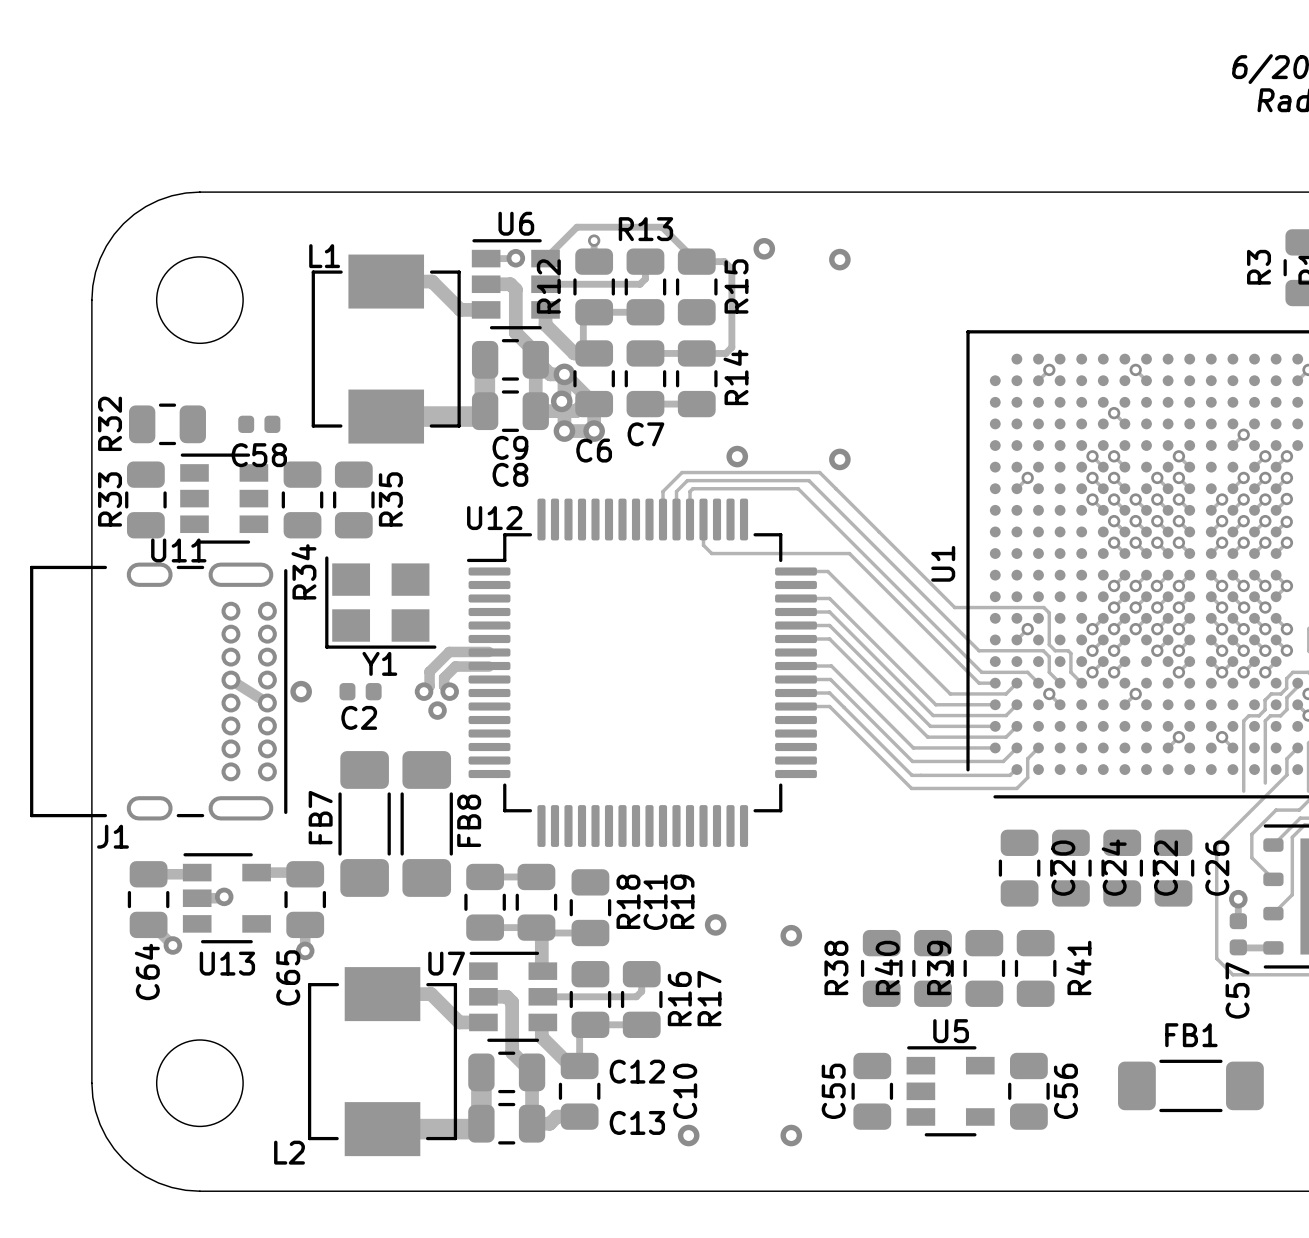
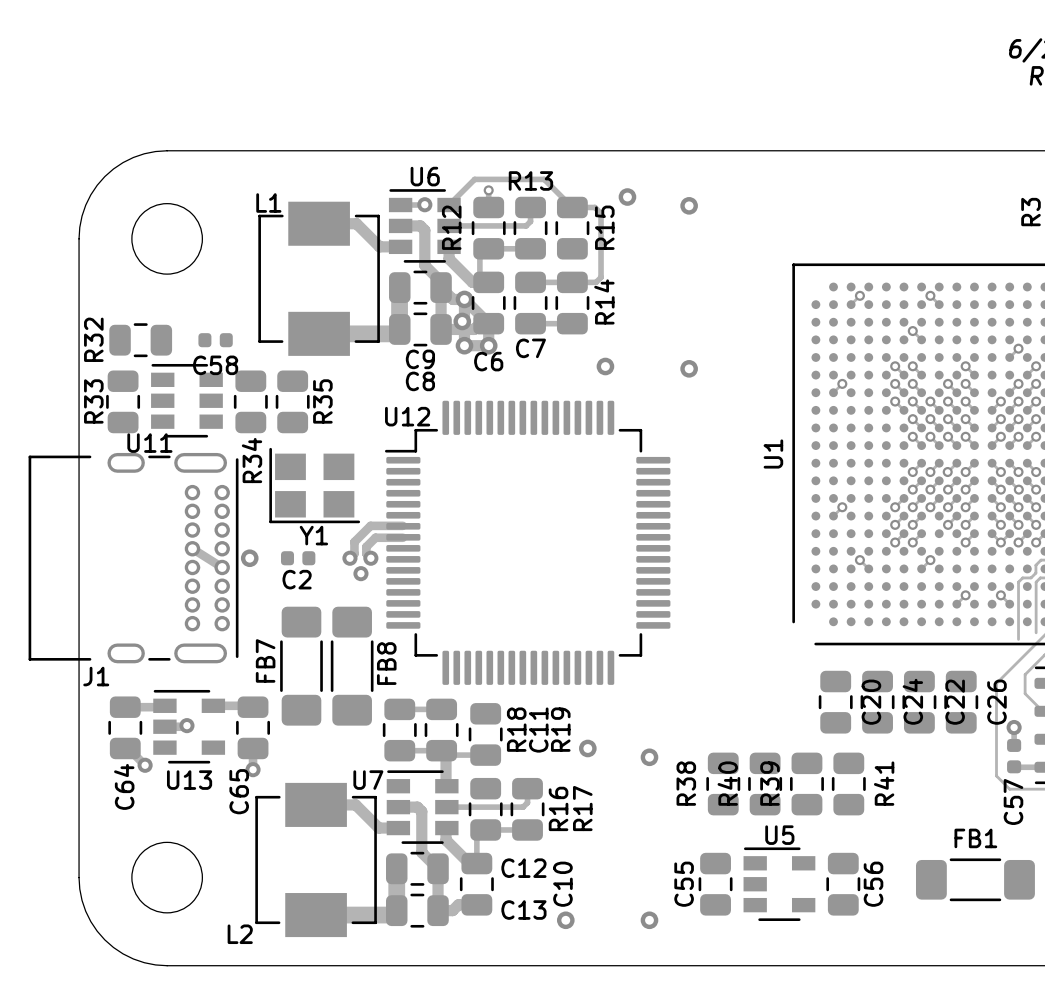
track: (663, 519) (663, 491) (682, 472) (819, 472) (954, 607) (1043, 607) (1049, 612) (1049, 644) (1055, 650) (1068, 650) (1070, 653) (1070, 672) (1081, 683) -> none
track: (676, 519) (676, 491) (687, 480) (808, 480) (979, 650) (1043, 650) (1049, 656) (1049, 672) (1060, 683) -> none
track: (690, 519) (690, 491) (692, 488) (798, 488) (981, 672) (1027, 672) (1038, 683) -> none
track: (703, 519) (703, 545) (711, 553) (849, 553) (979, 683) (995, 683) -> none
track: (796, 571) (827, 571) (950, 693) (1006, 693) (1016, 683) -> none
track: (796, 598) (829, 598) (935, 704) (995, 704) -> none
track: (796, 612) (829, 612) (933, 715) (1006, 715) (1016, 704) -> none
track: (796, 625) (829, 625) (930, 726) (995, 726) -> none
track: (796, 639) (829, 639) (927, 737) (1006, 737) (1016, 726) -> none
track: (796, 666) (831, 666) (913, 747) (995, 747) -> none
track: (796, 679) (830, 679) (912, 761) (1003, 761) (1016, 747) -> none
track: (796, 693) (829, 693) (911, 775) (1010, 775) (1016, 769) -> none
track: (796, 706) (829, 706) (911, 788) (1016, 788) (1027, 777) (1027, 758) (1038, 747) -> none

